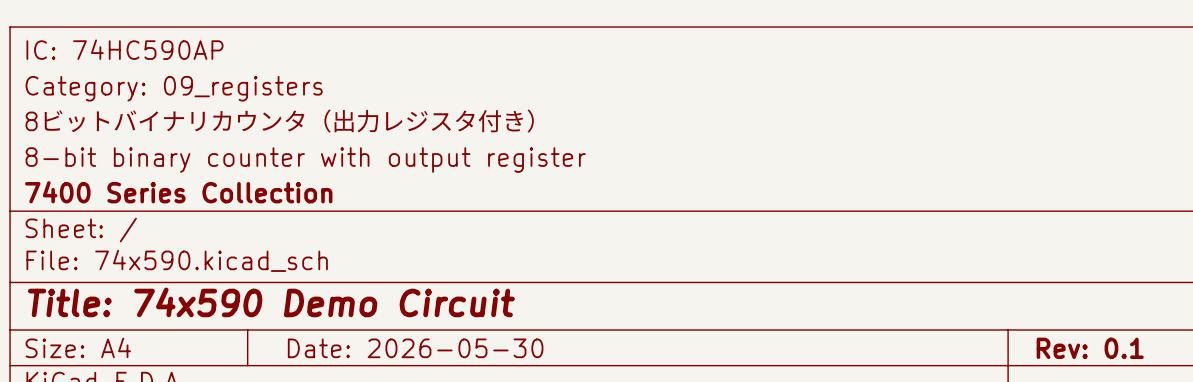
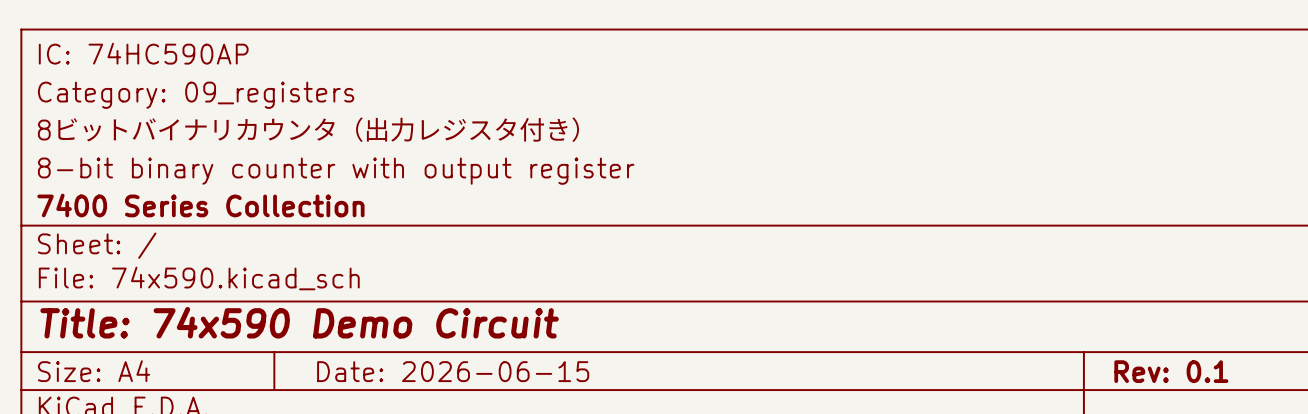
title block: Date: 2026-05-30 (415, 348) -> Date: 2026-06-15 (453, 371)

